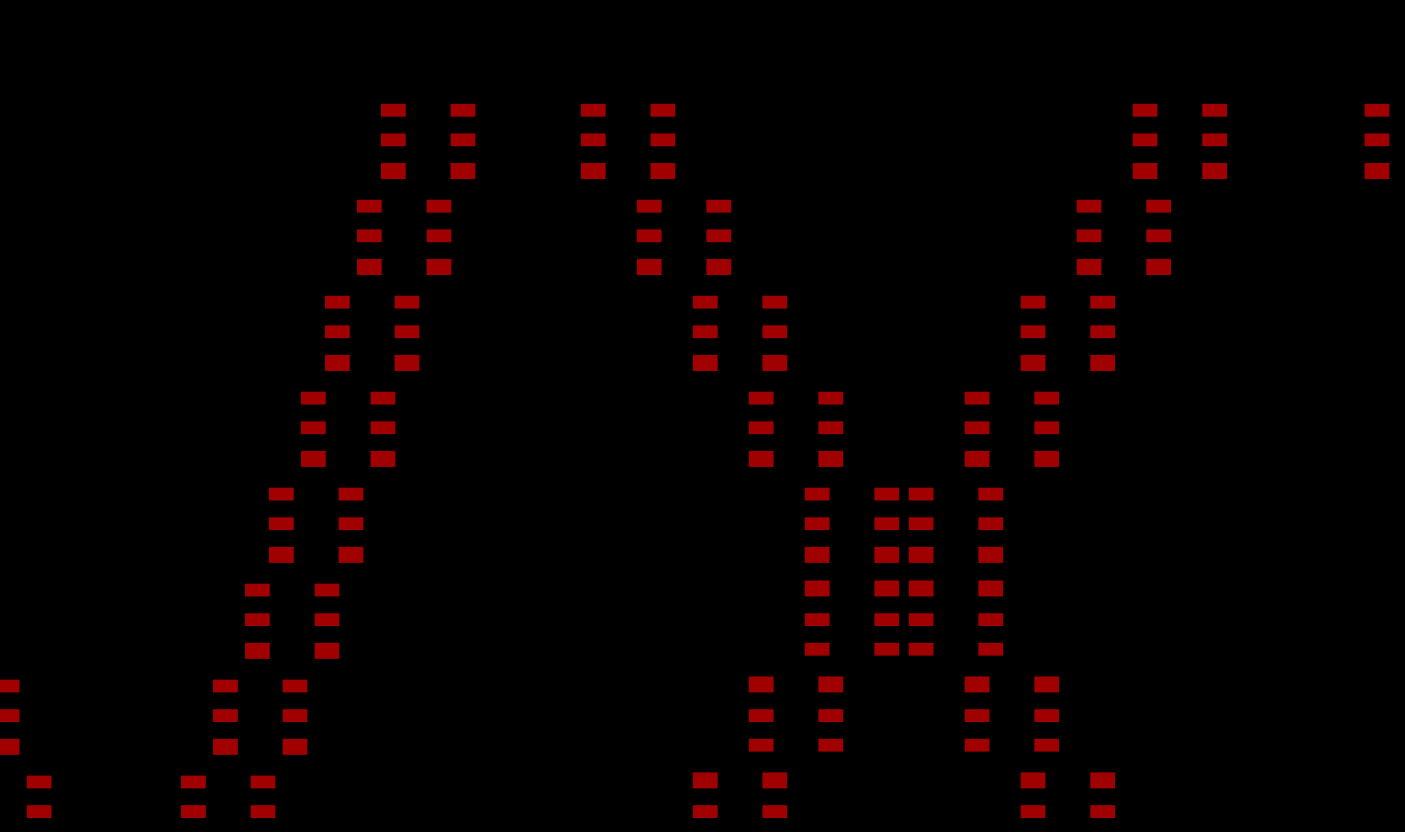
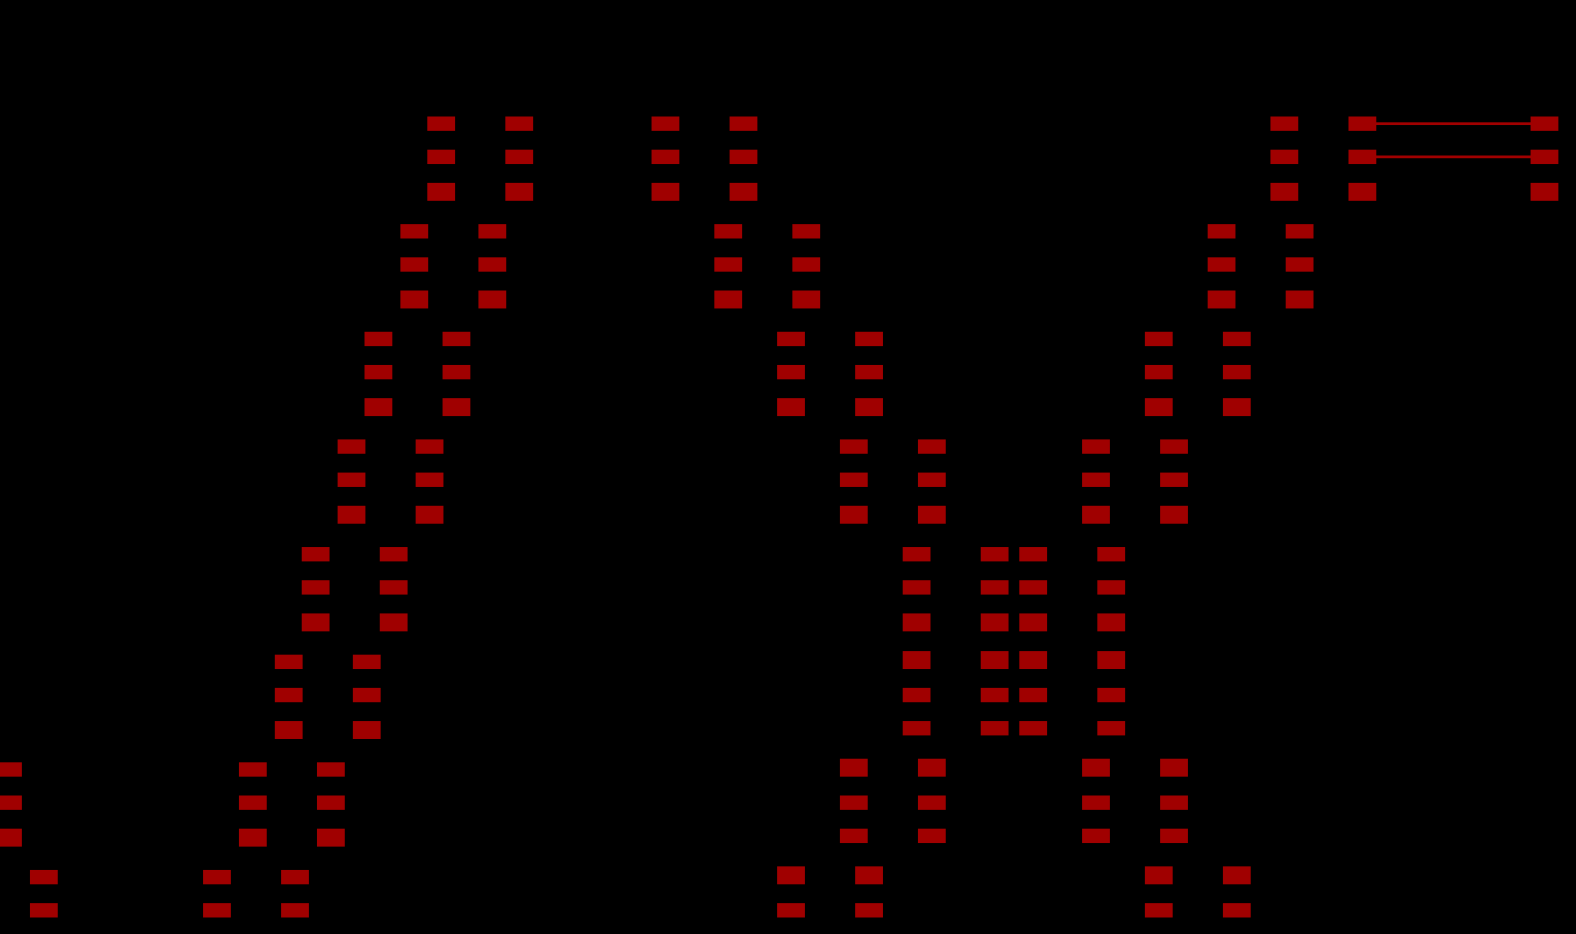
top track: none -> (1544, 123) (1362, 123)
top track: none -> (1544, 156) (1362, 156)

